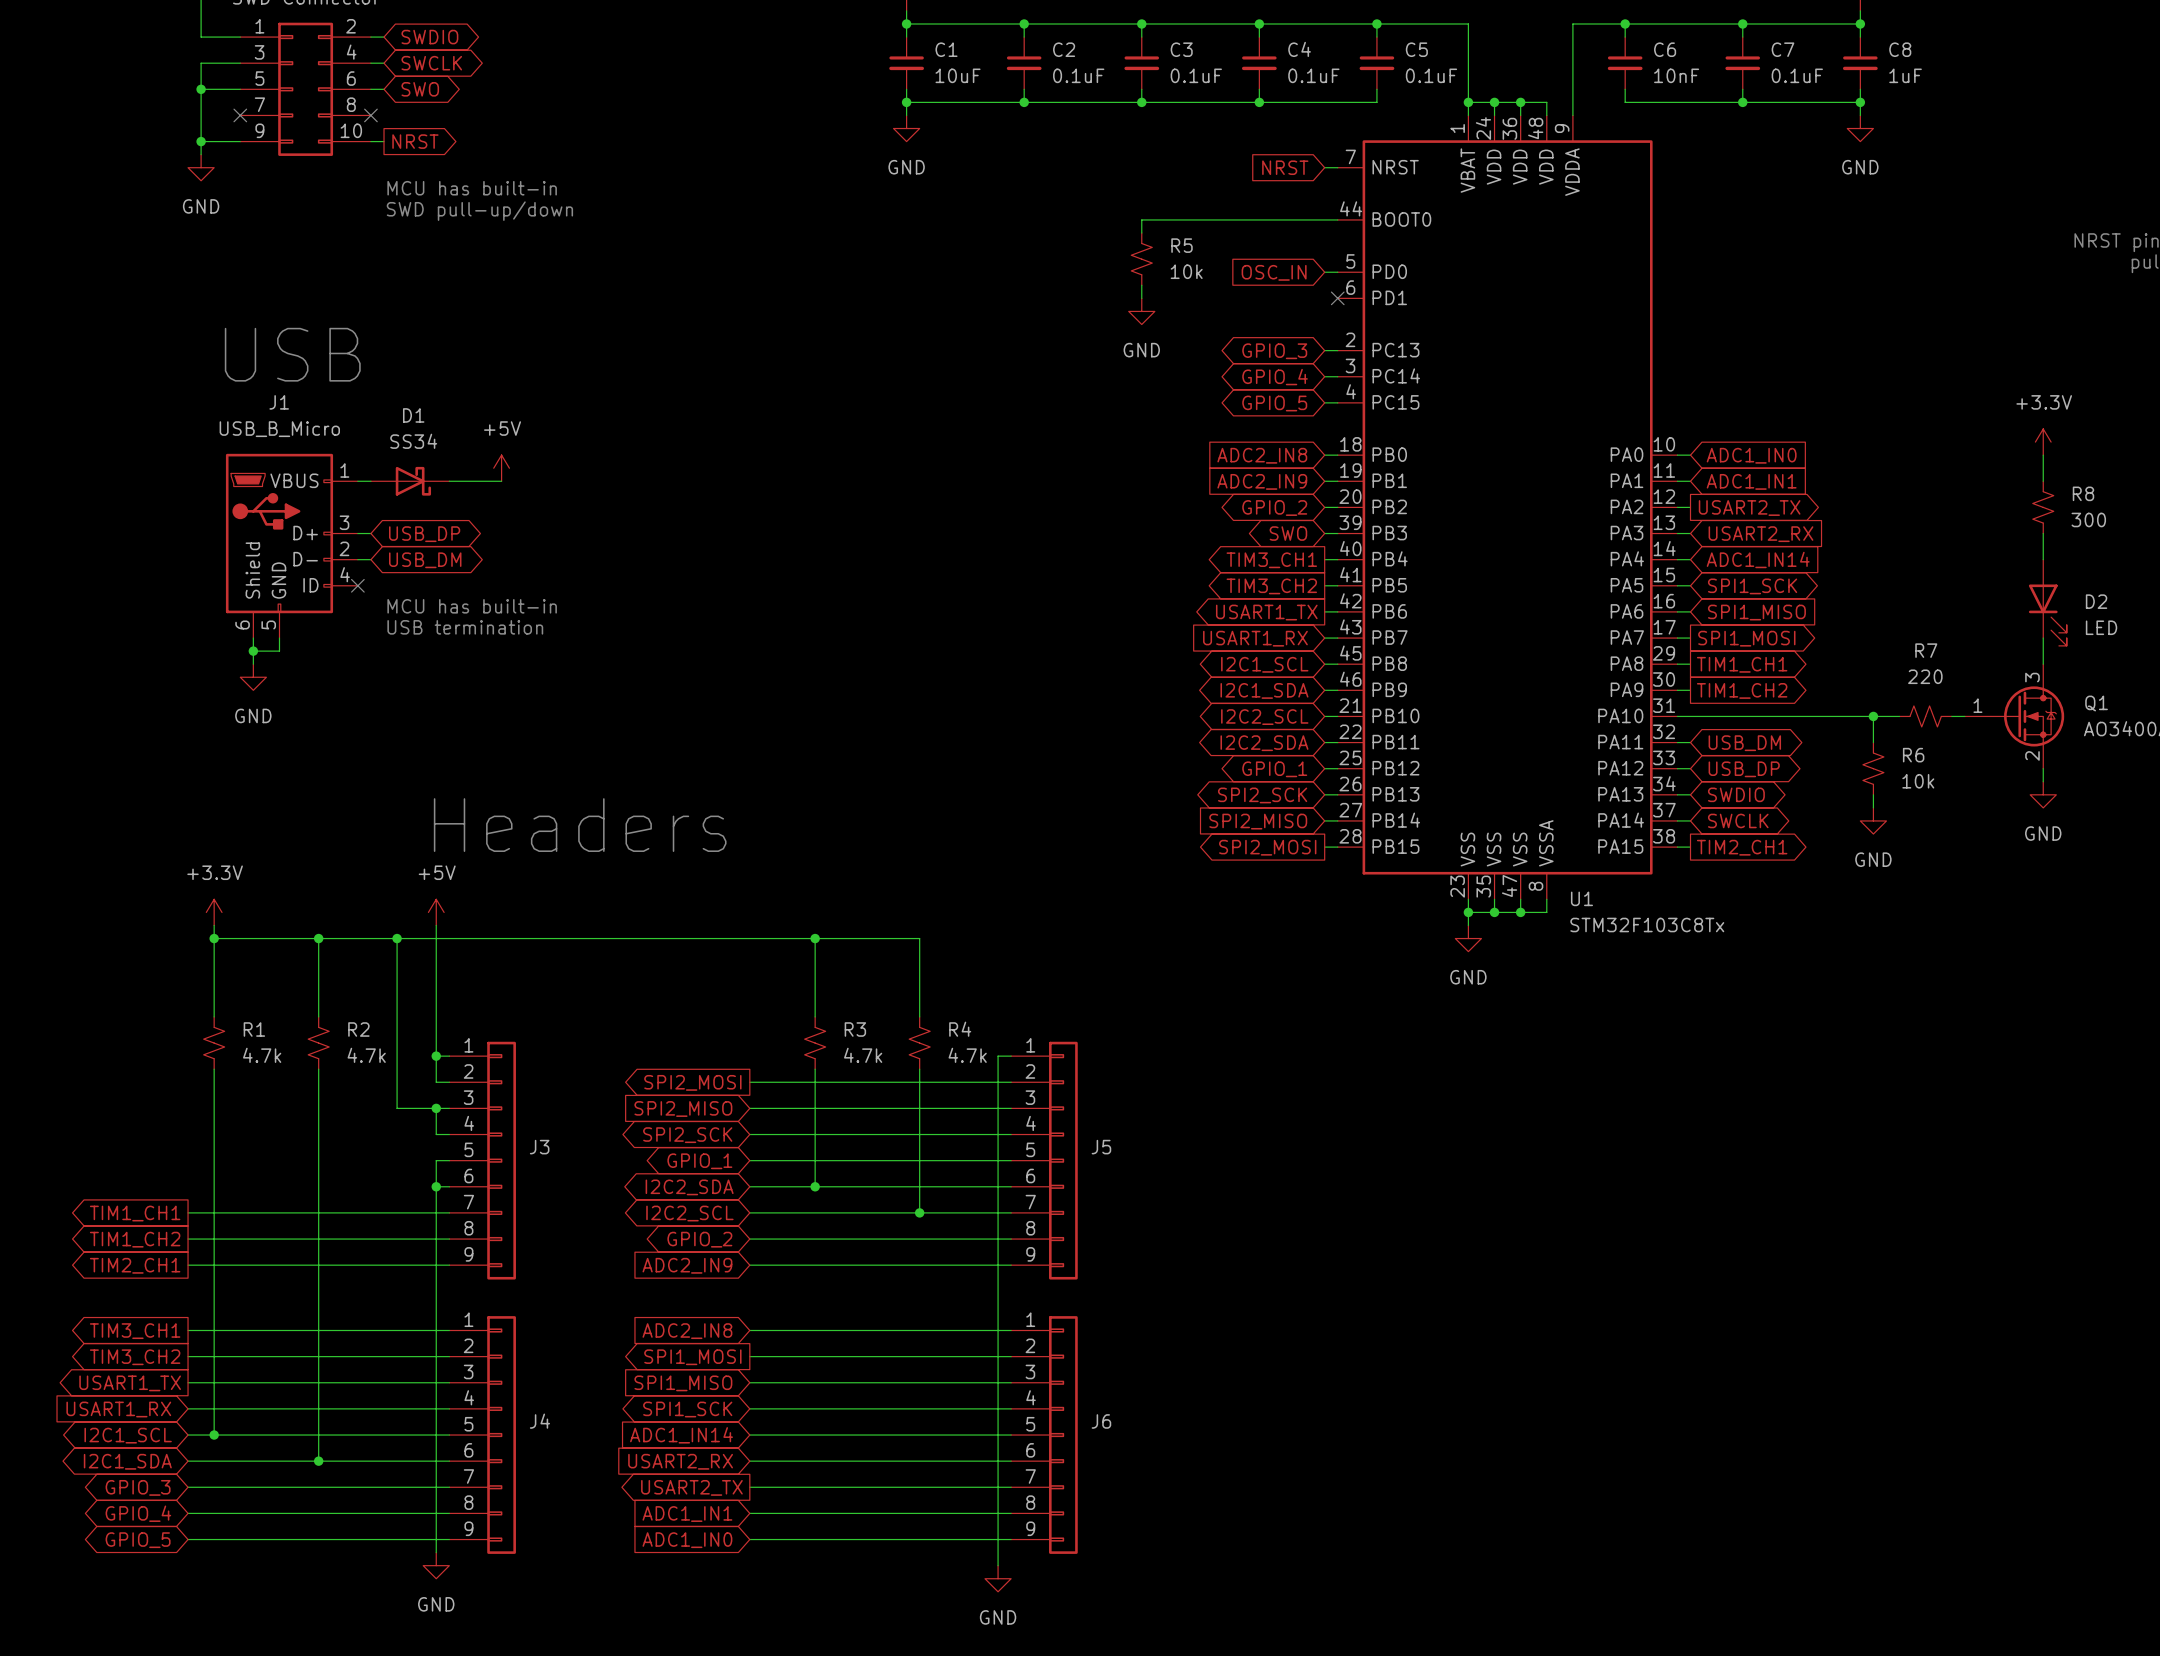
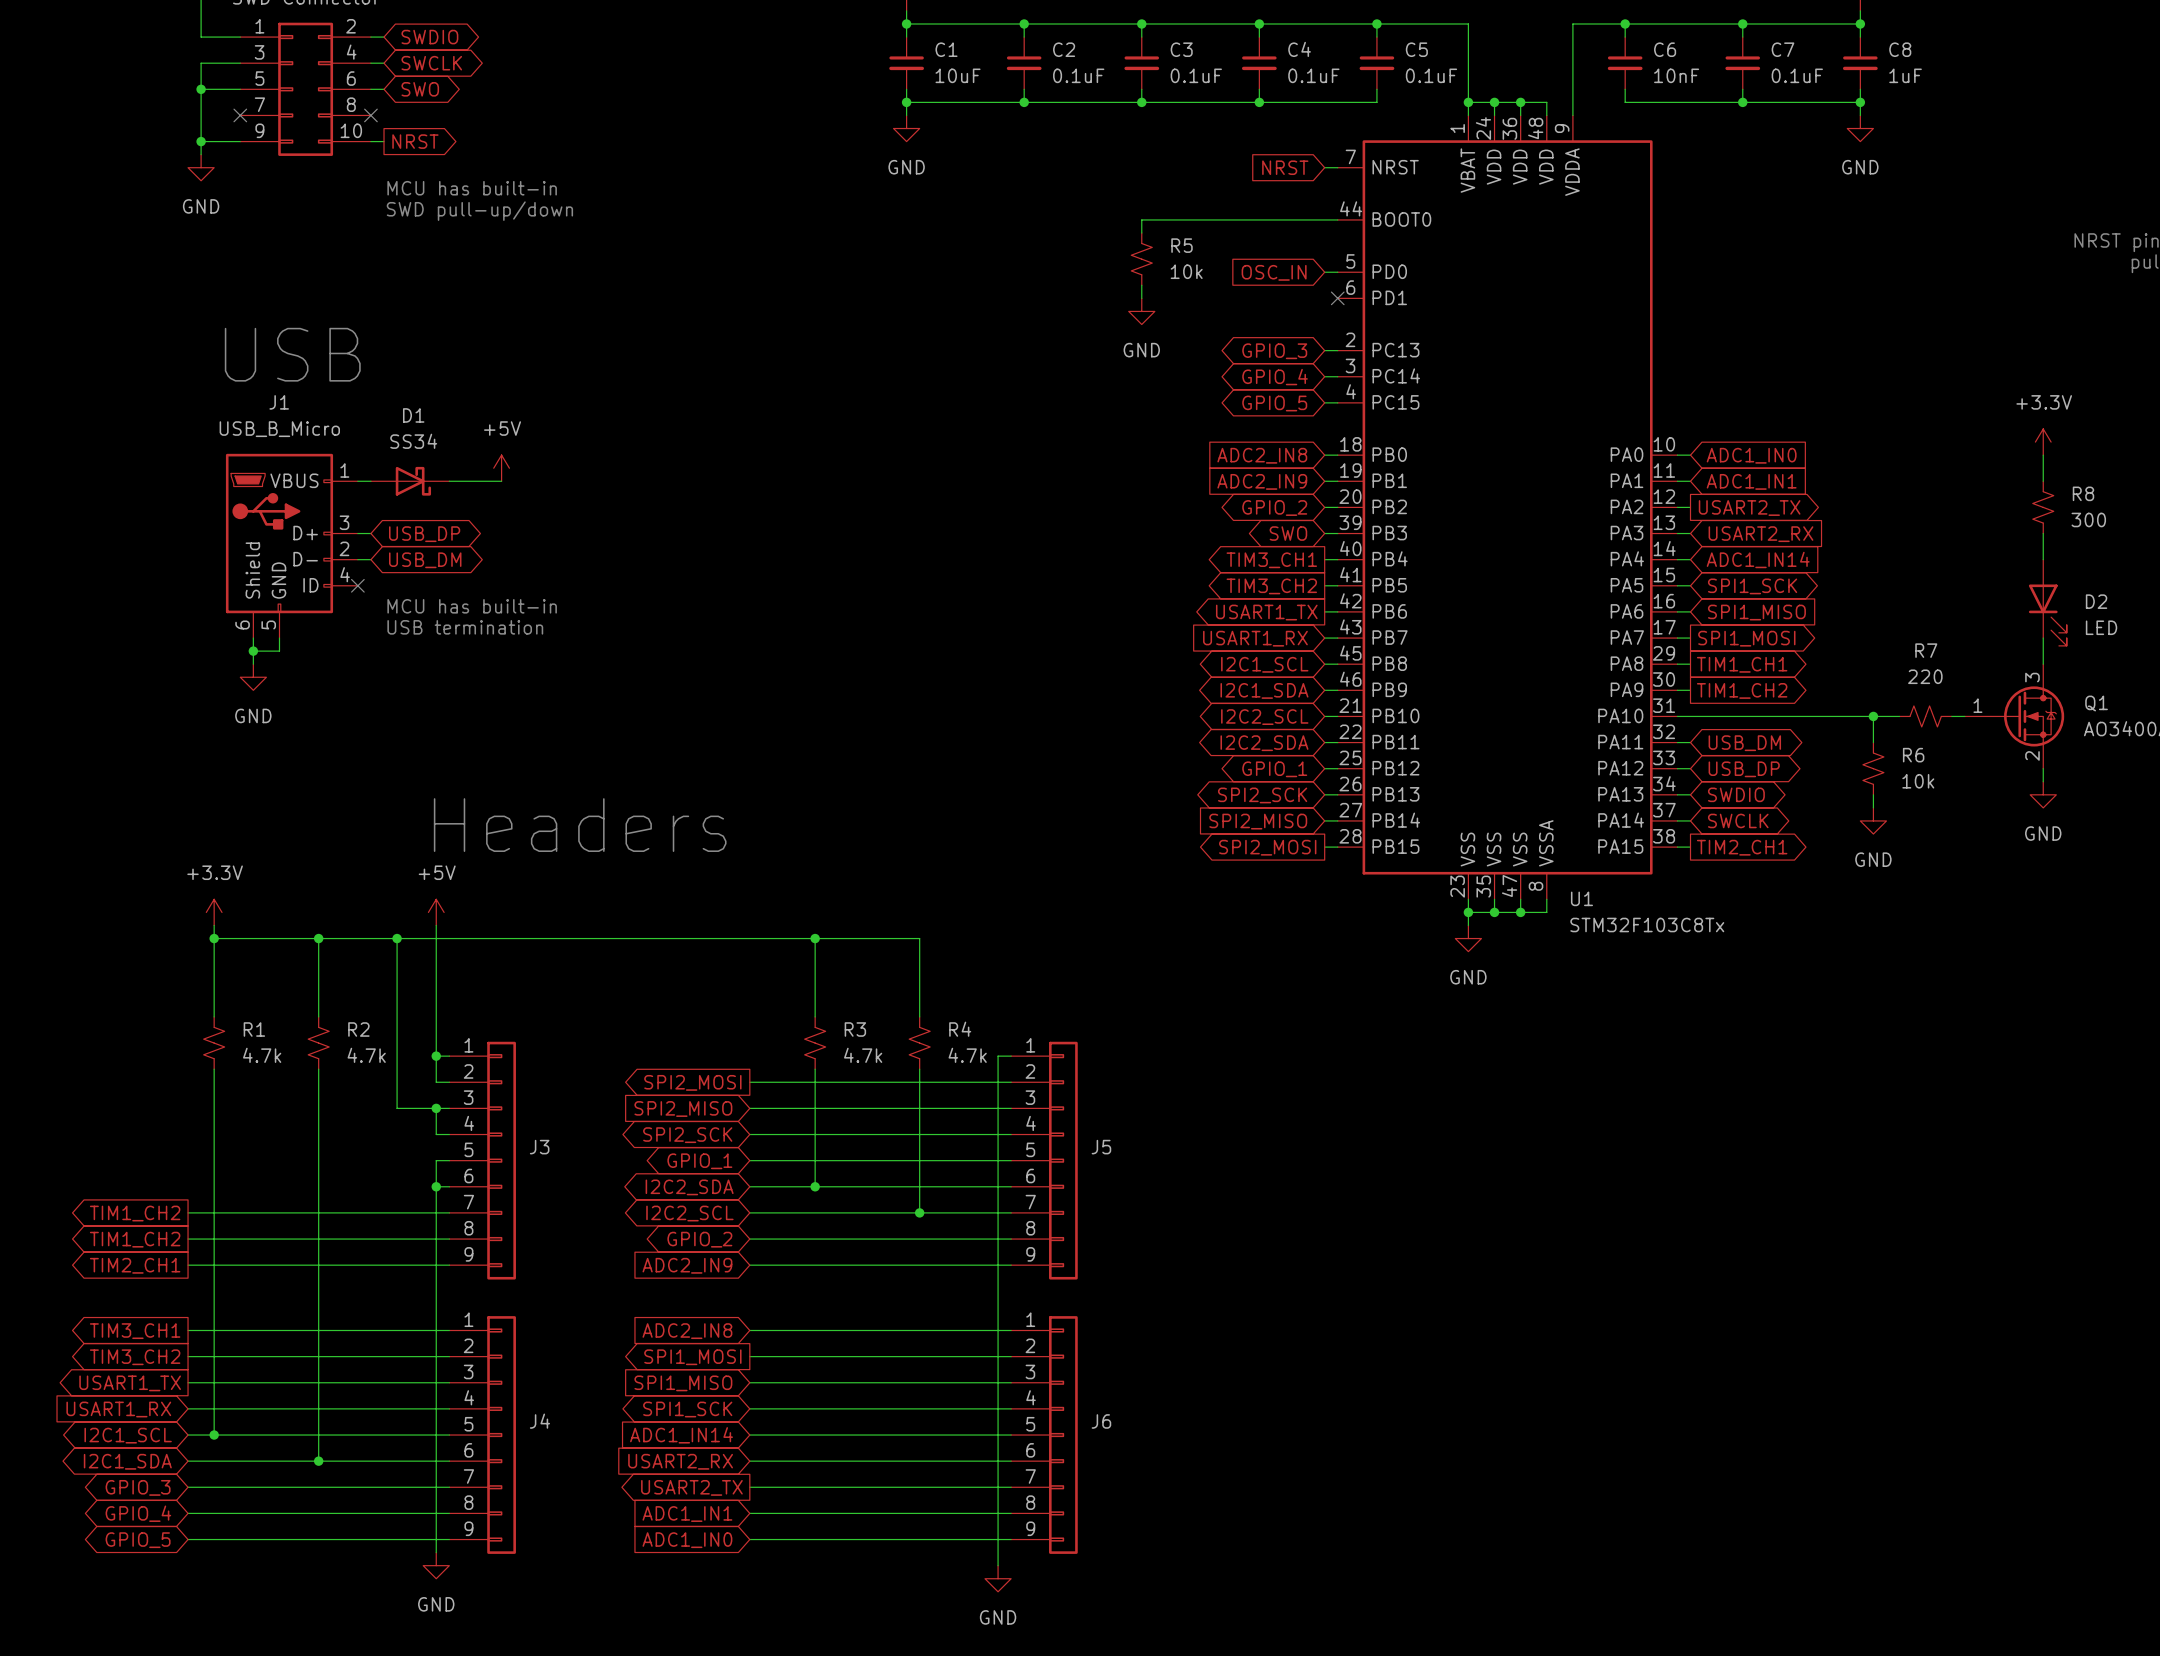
global label: TIM1_CH1 (135, 1213) -> TIM1_CH2 (135, 1213)

